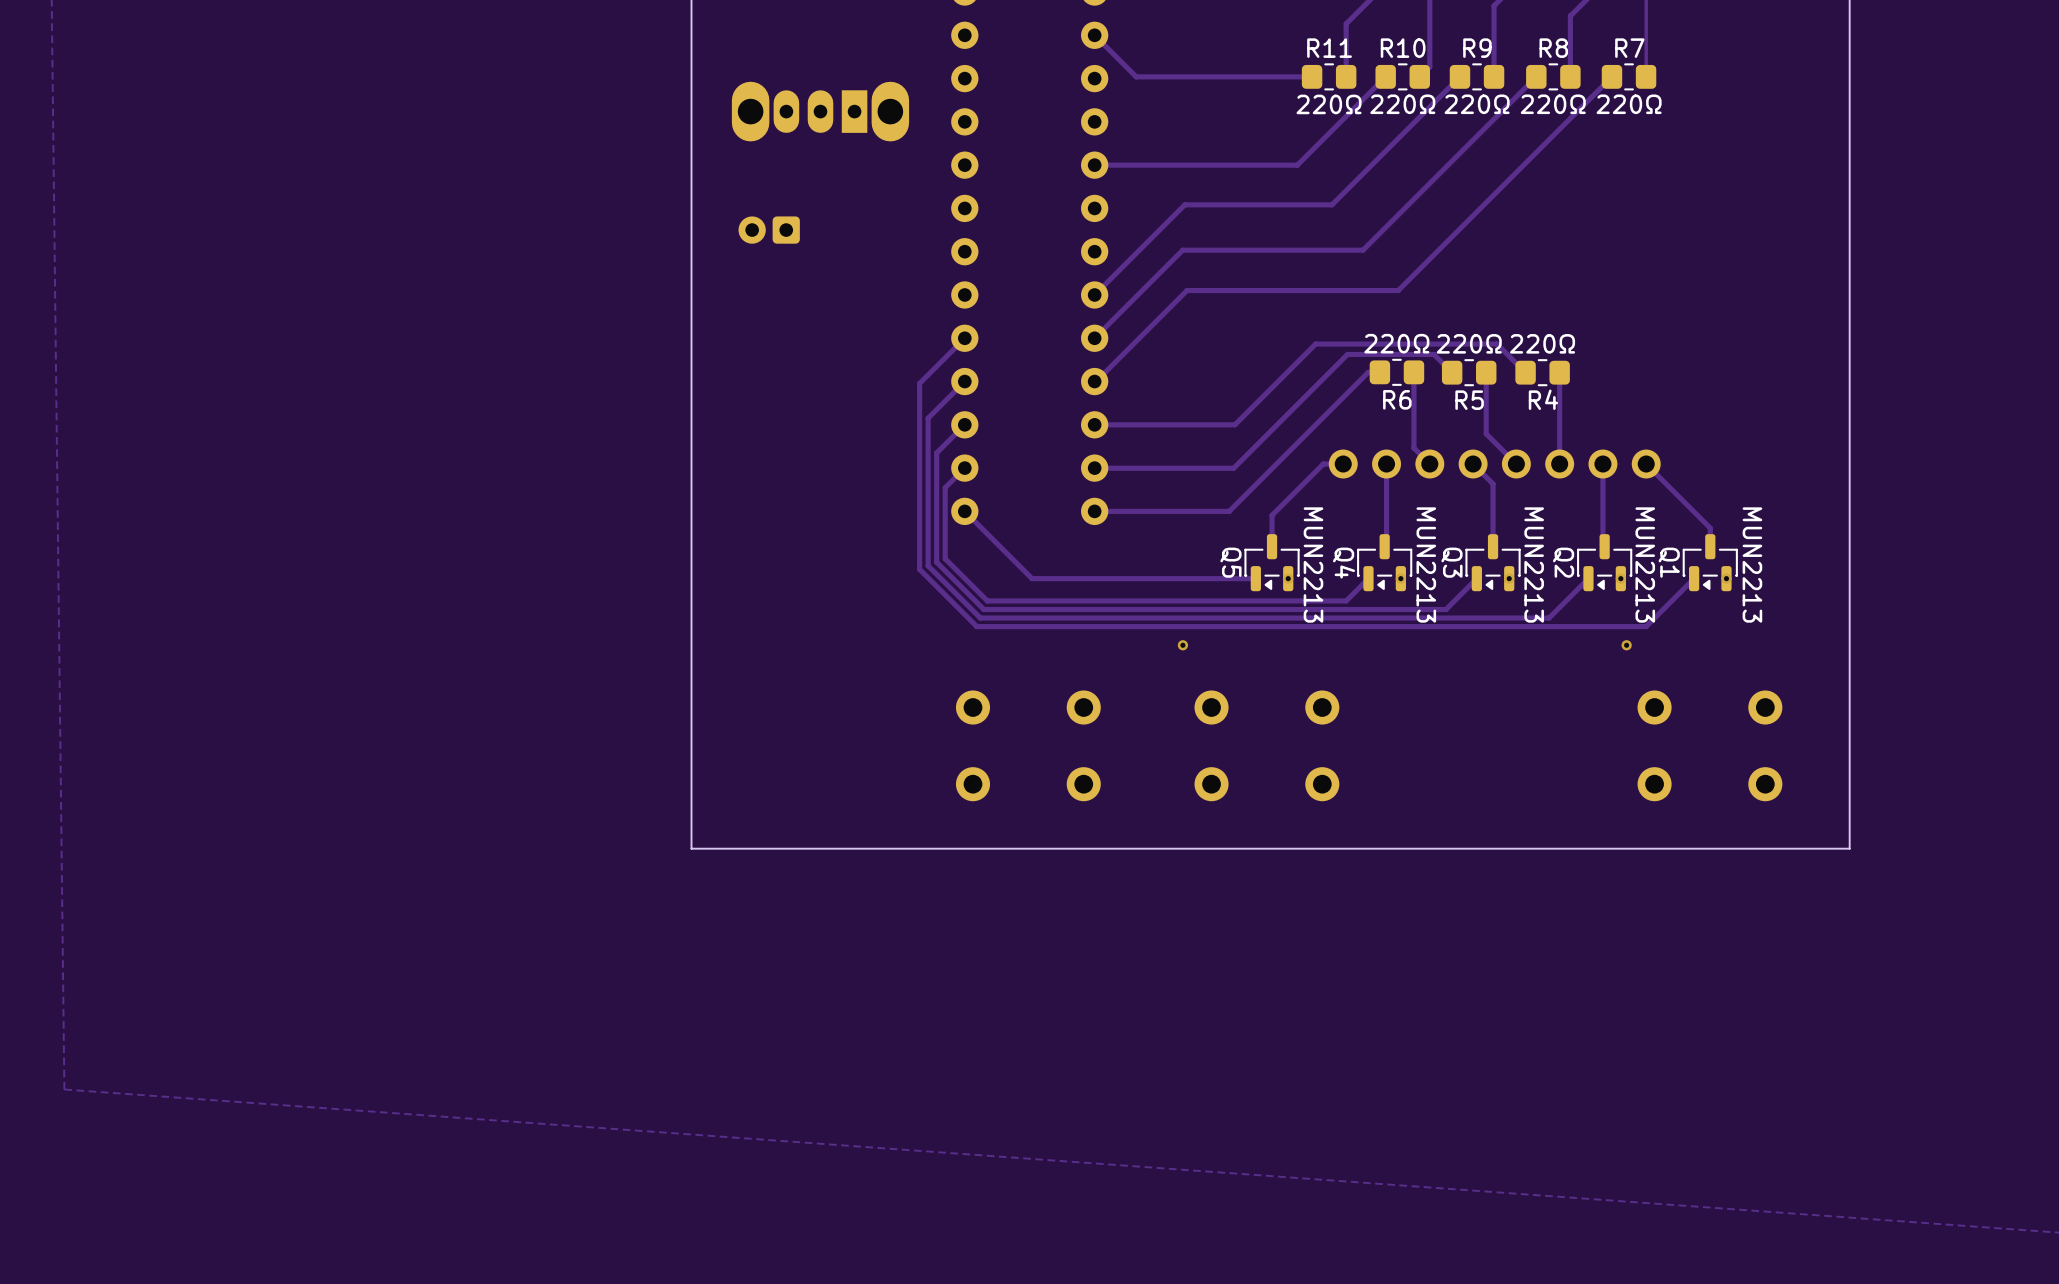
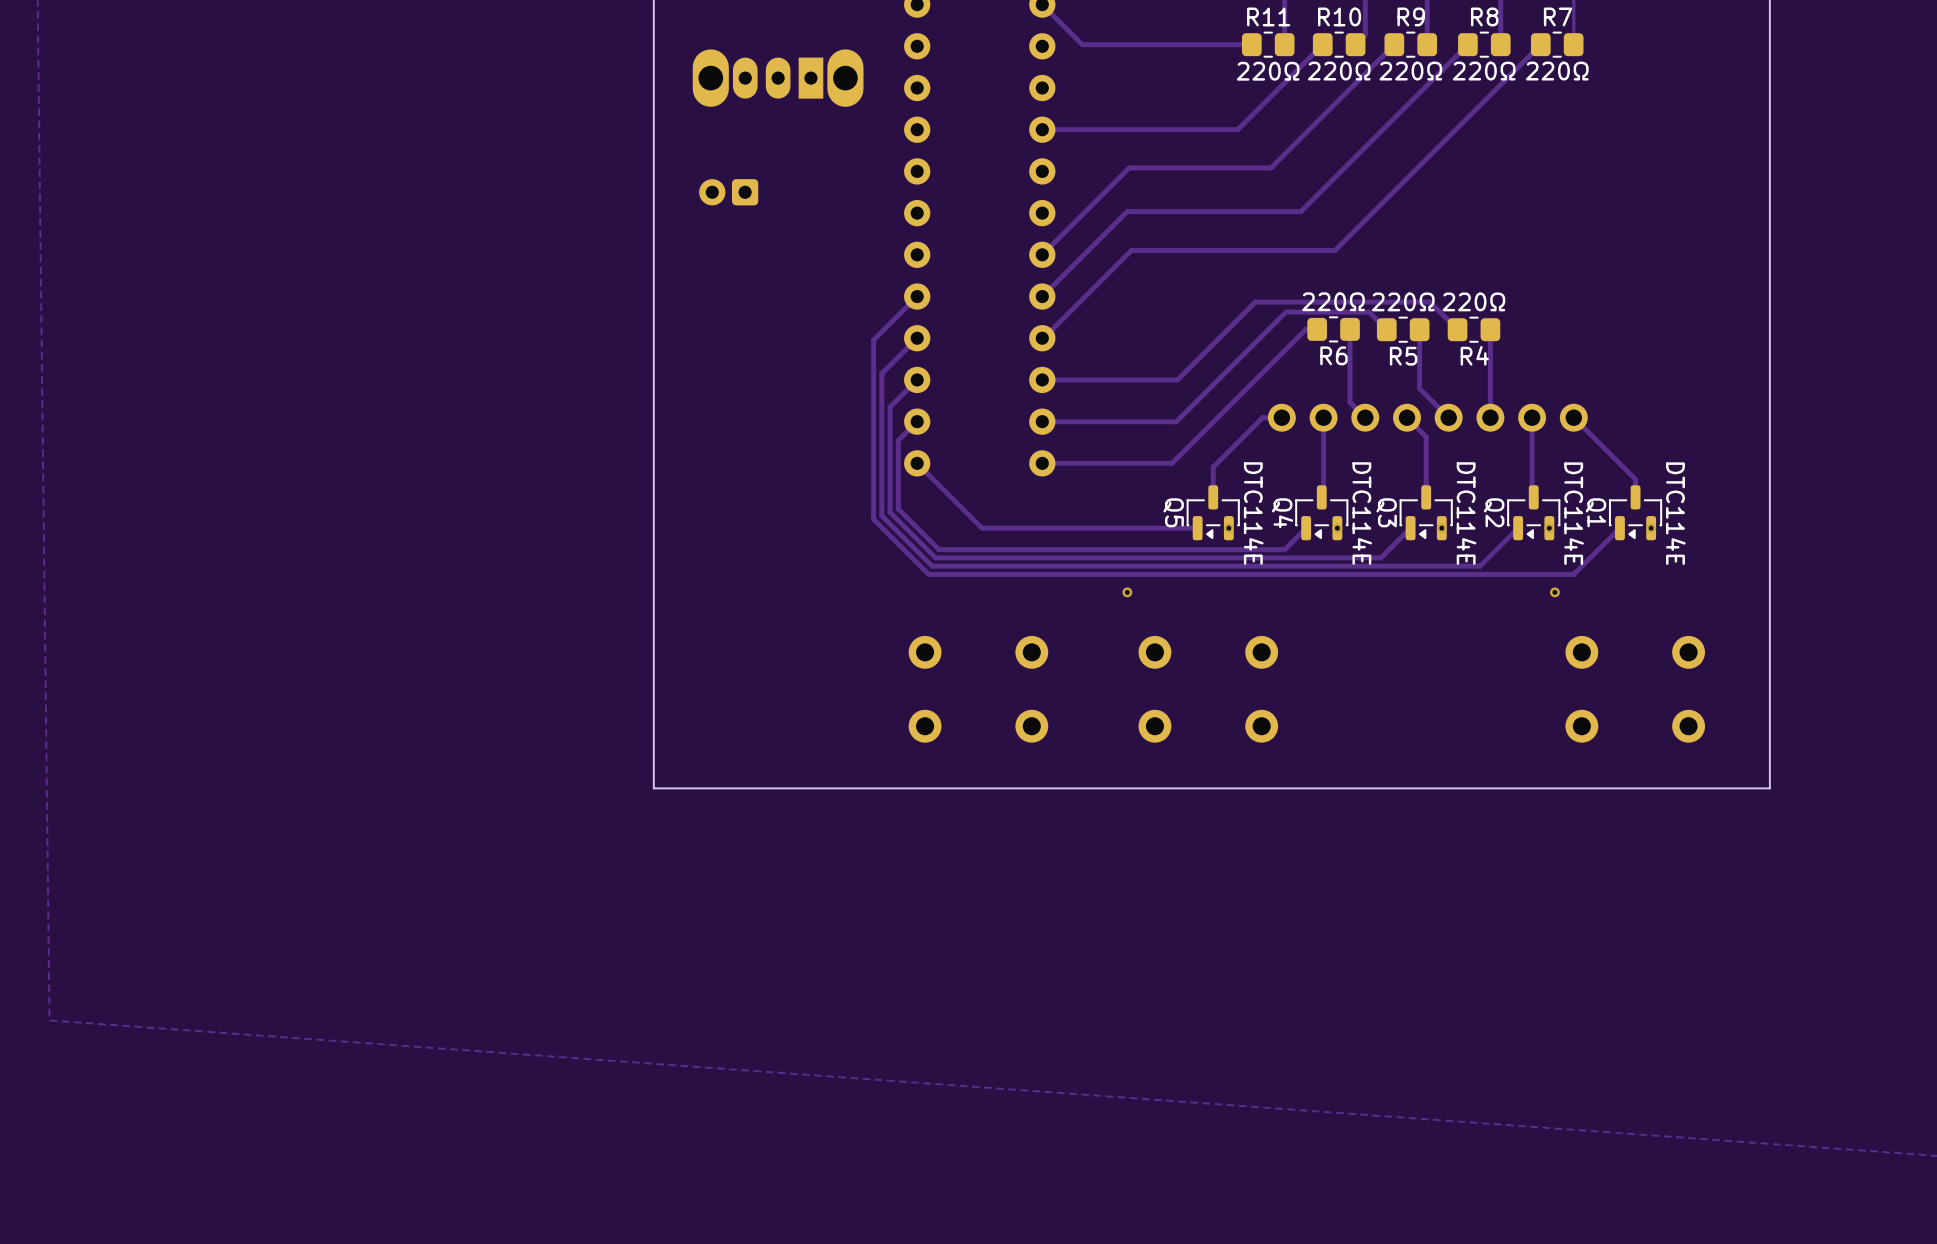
text: MUN2213 (1313, 565) -> DTC114E (1253, 513)
text: MUN2213 (1426, 565) -> DTC114E (1362, 513)
text: MUN2213 (1534, 565) -> DTC114E (1466, 513)
text: MUN2213 (1645, 565) -> DTC114E (1574, 513)
text: MUN2213 (1752, 565) -> DTC114E (1675, 513)

